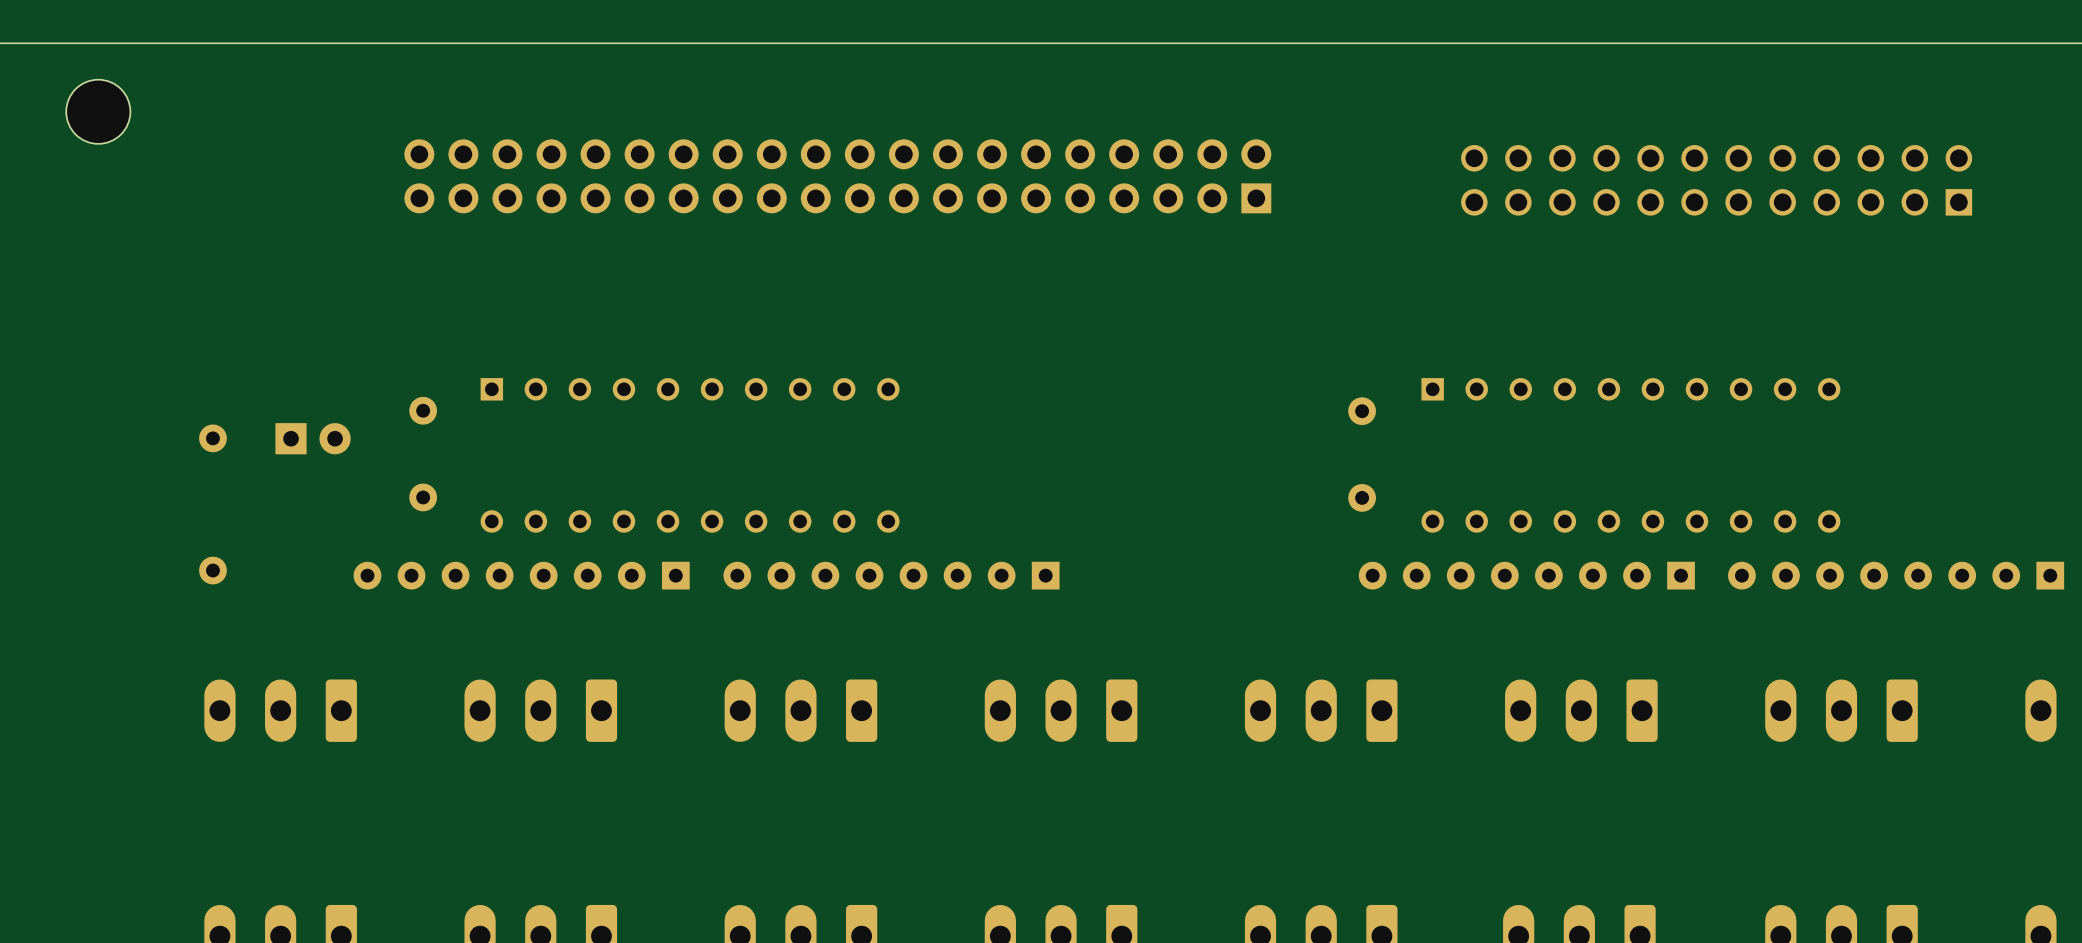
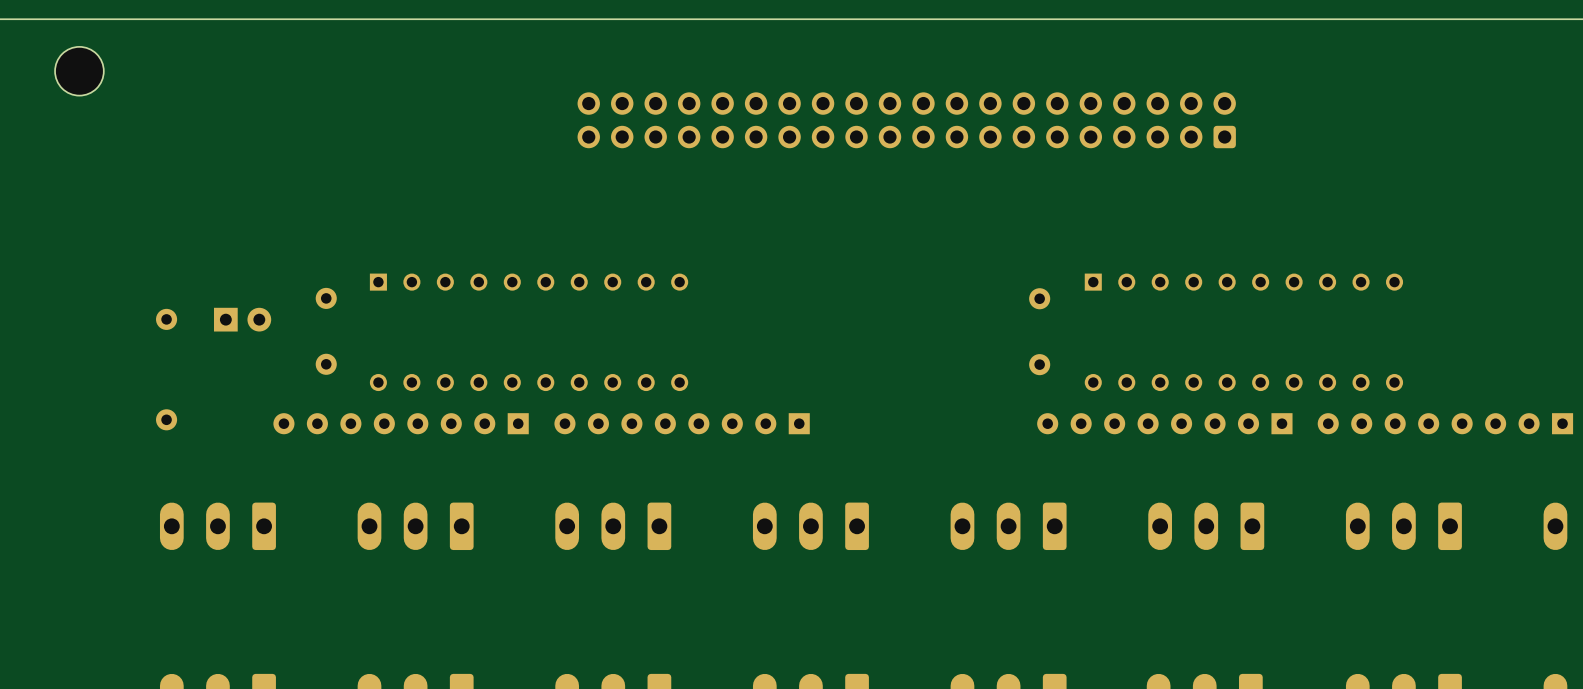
part: (837, 176) -> none
part: none -> (906, 120)
part: (1716, 180) -> none

